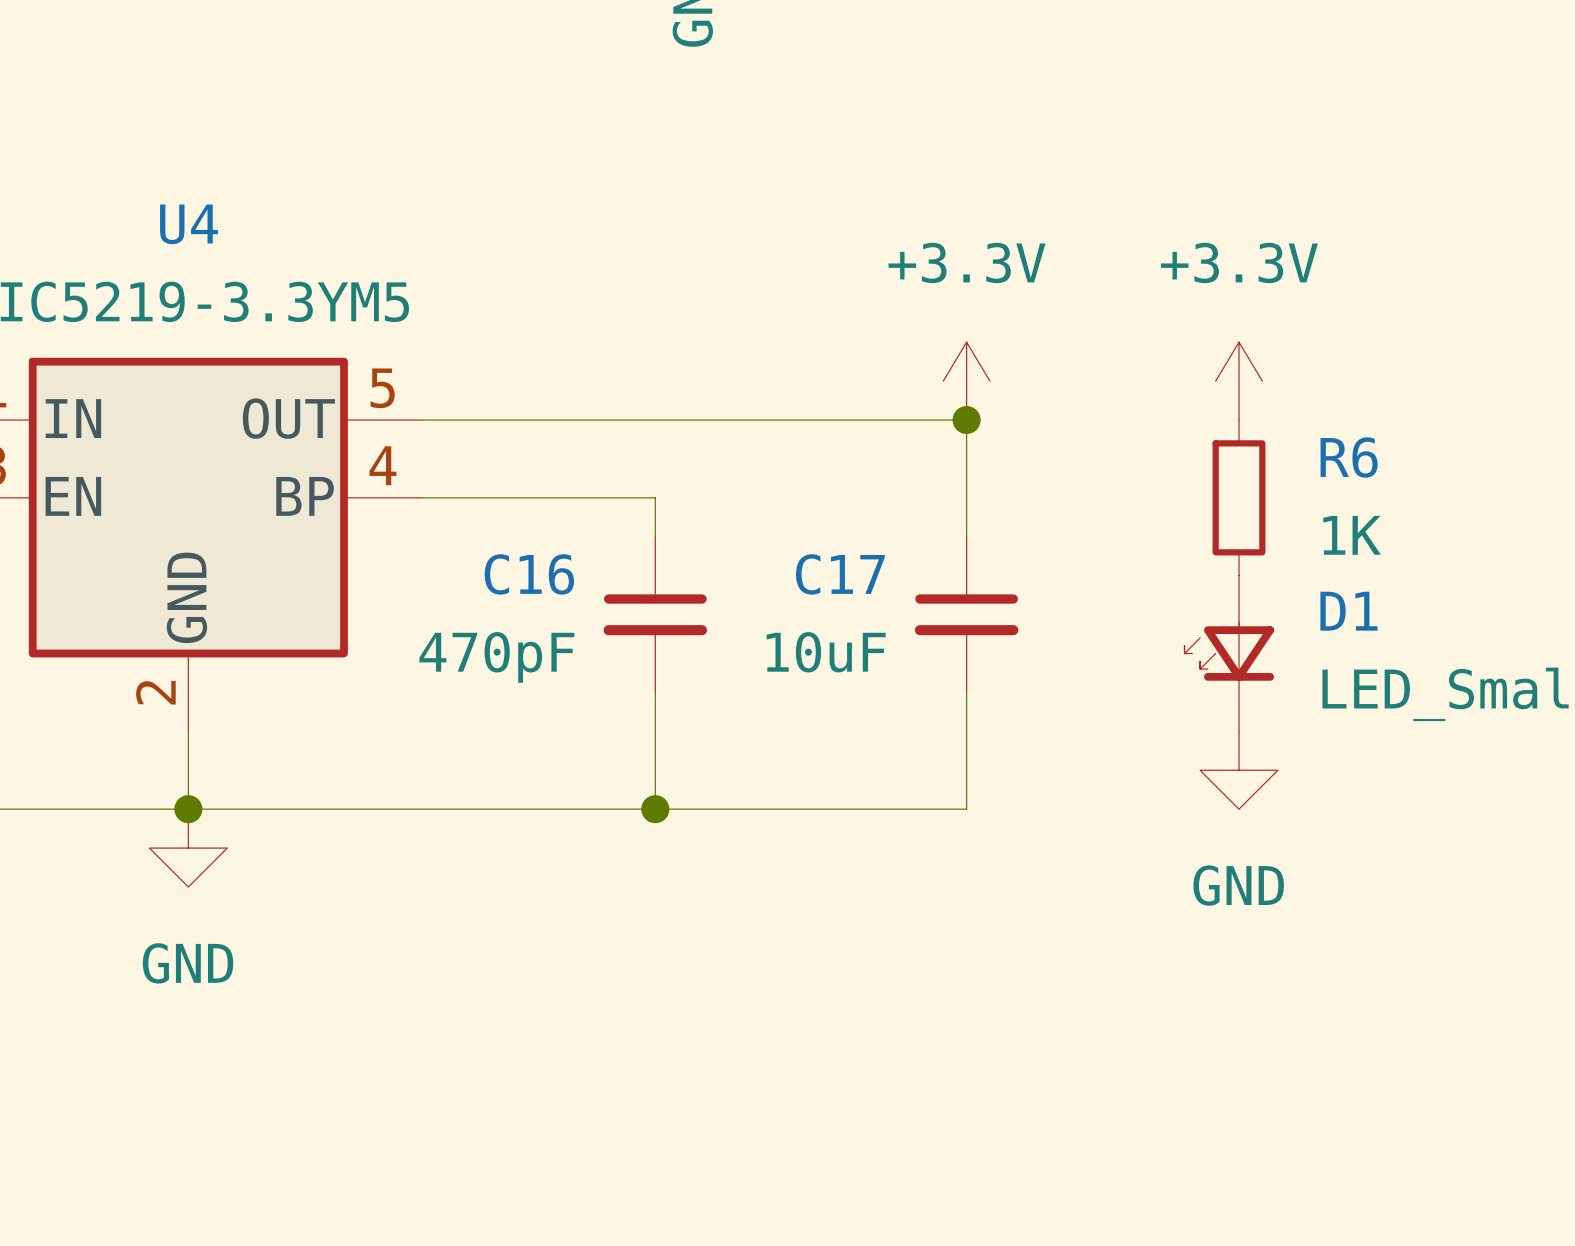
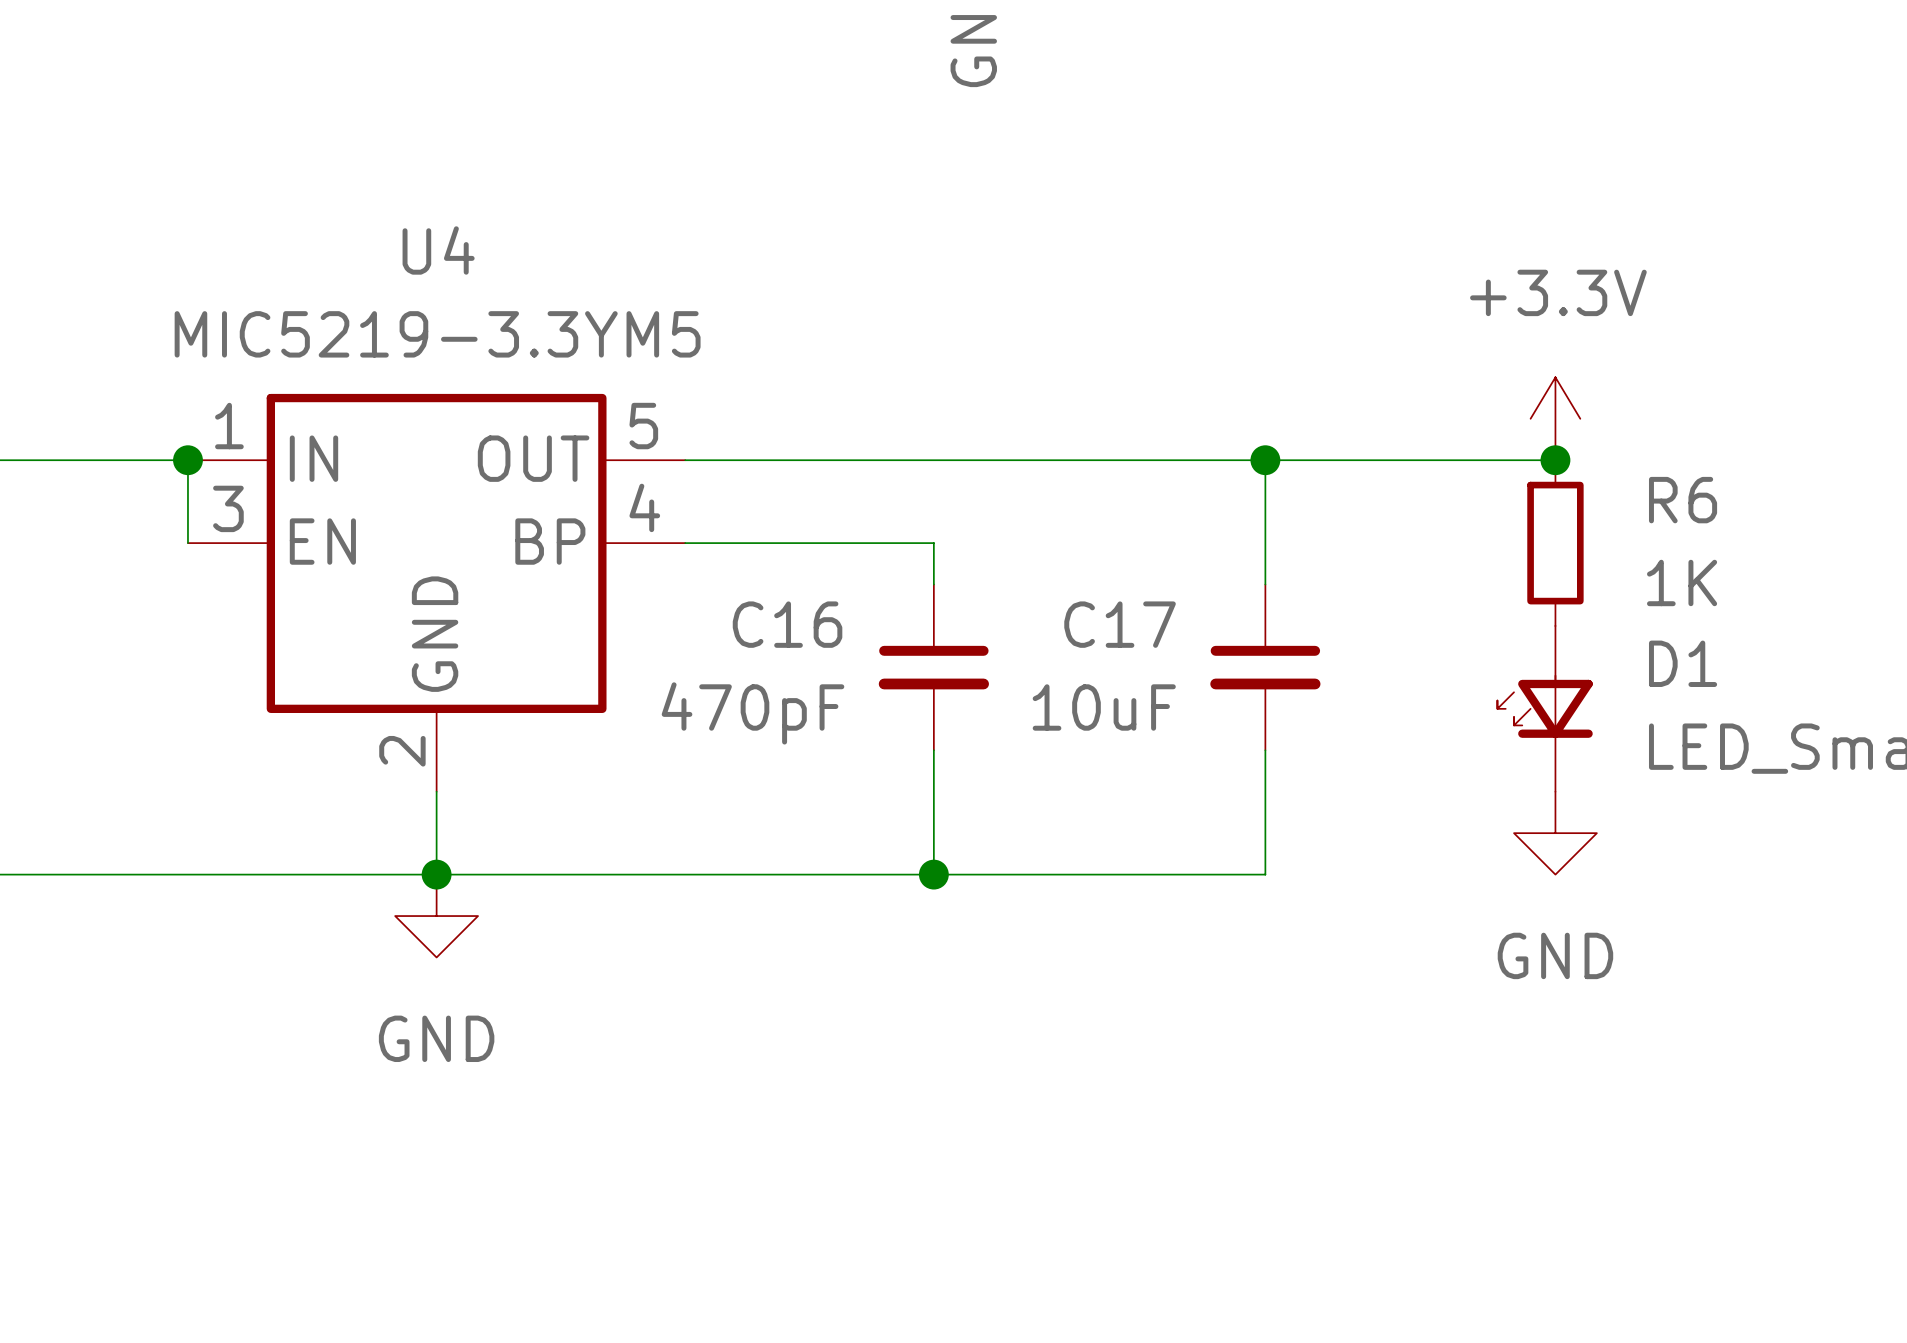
power symbol: +3.3V (966, 381) -> none
wire: none -> (1265, 460) (1555, 460)
junction: none -> (1555, 460)

